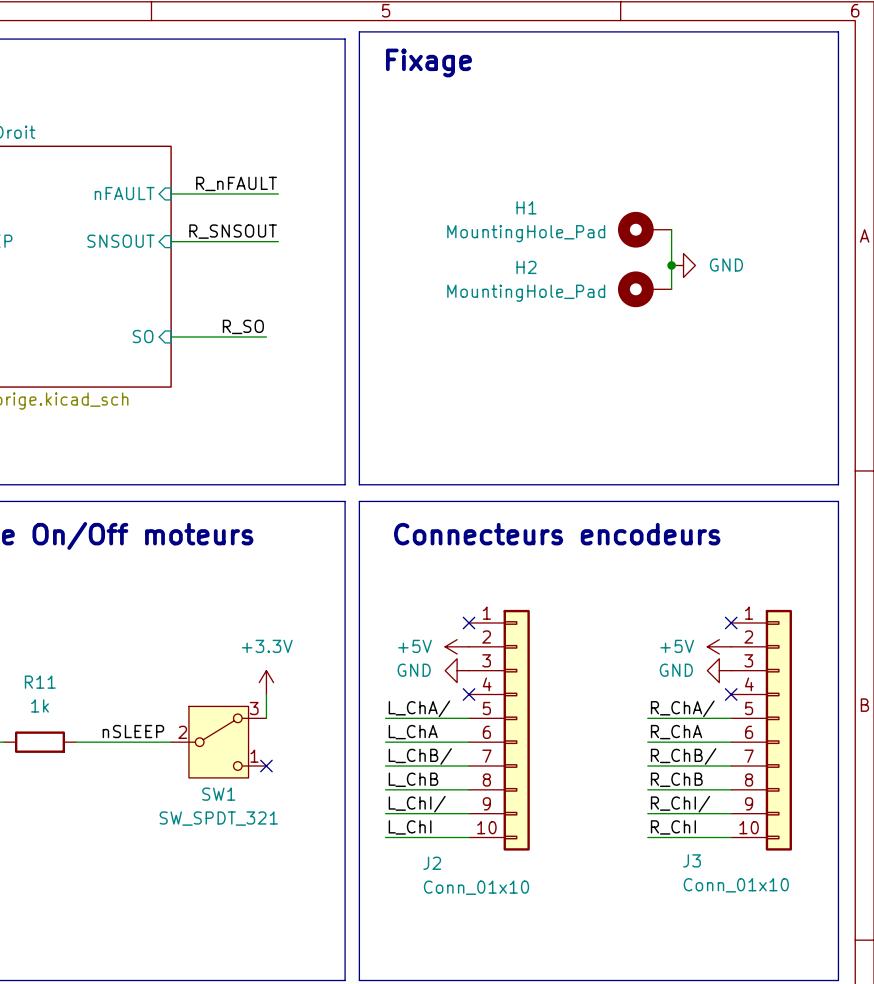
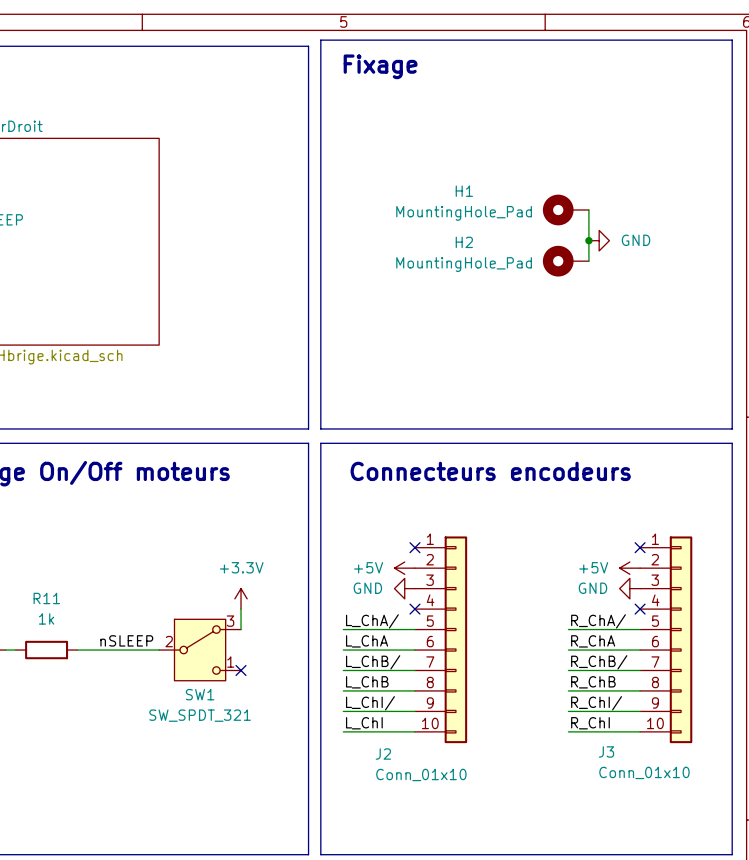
label: R_nFAULT (236, 183) -> none
sheet pin: nFAULT (124, 193) -> none
wire: (171, 193) (278, 193) -> none
label: R_SNSOUT (233, 231) -> none
sheet pin: SNSOUT (120, 241) -> none
wire: (171, 241) (278, 241) -> none
label: R_SO (243, 326) -> none
sheet pin: SO (143, 336) -> none
wire: (171, 336) (266, 336) -> none

